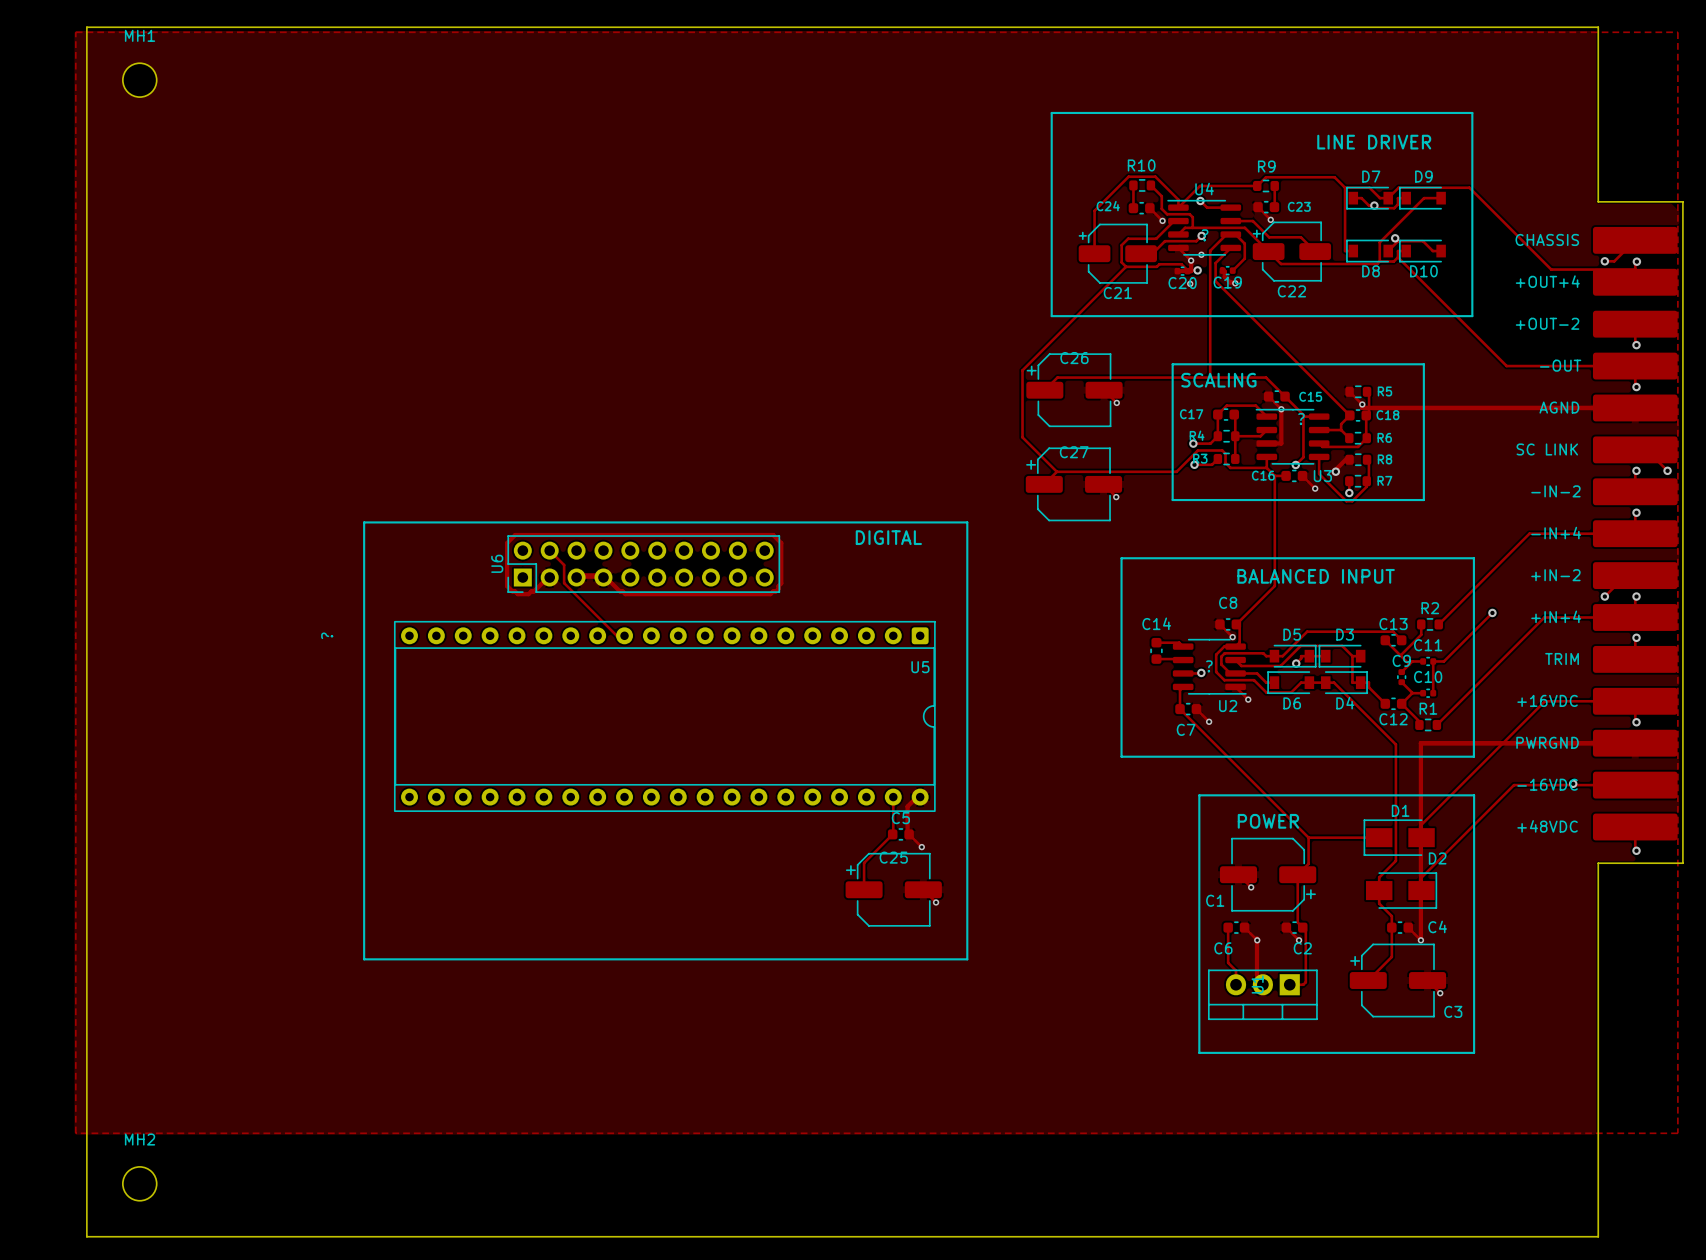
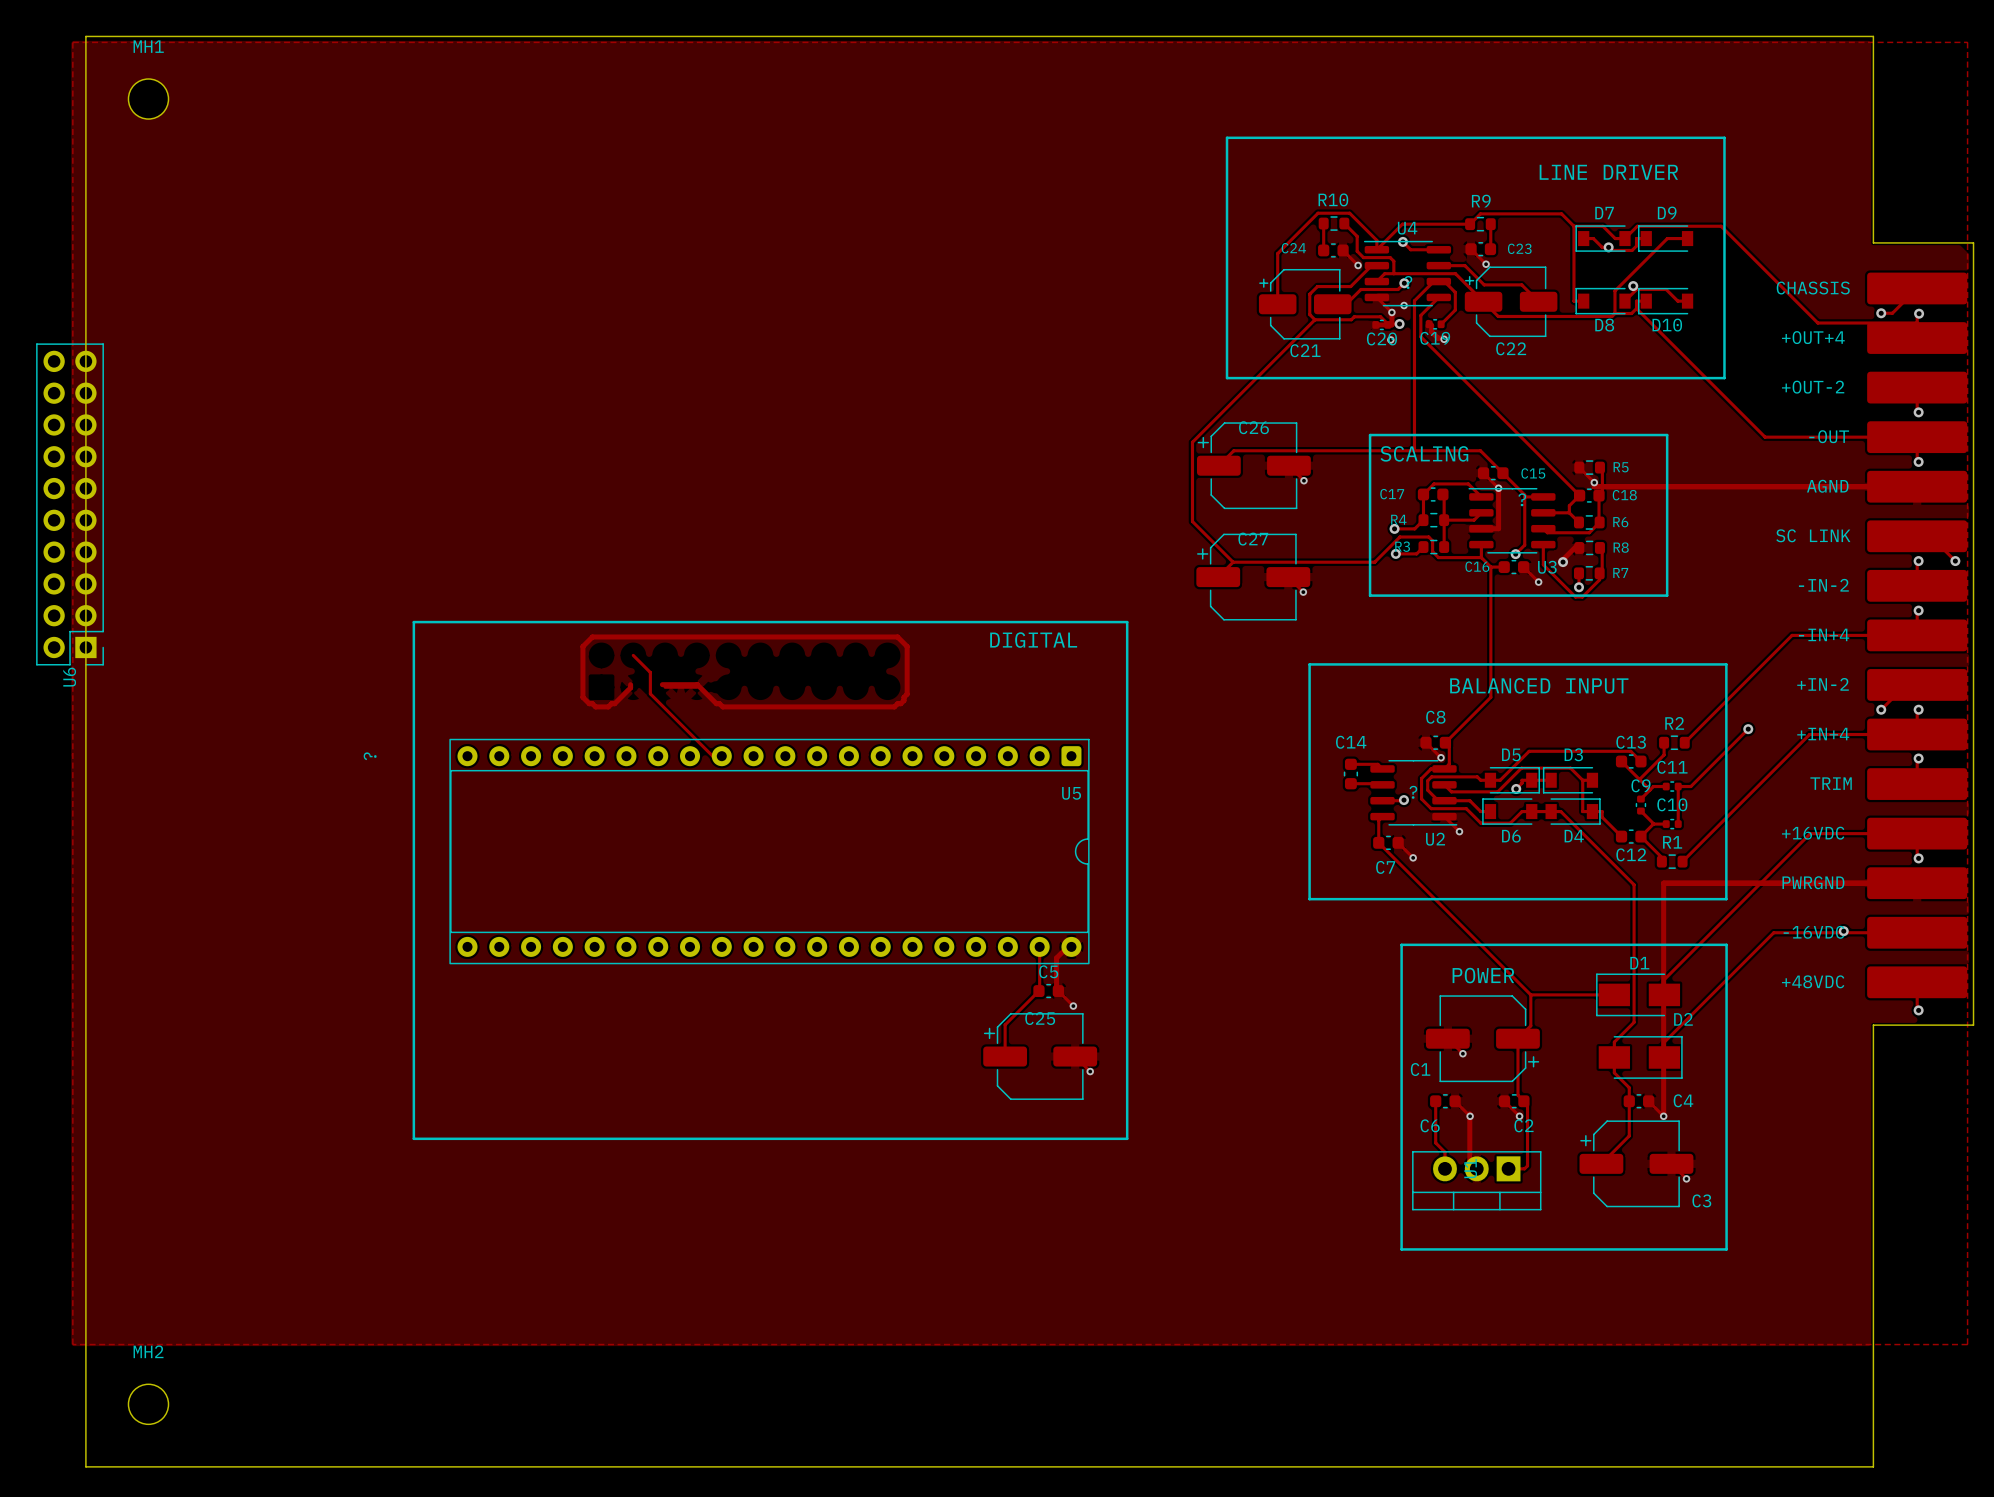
U6 rotation: 0° (643, 564) -> 90° counterclockwise (70, 504)
U6 position: (643, 564) -> (70, 504)

